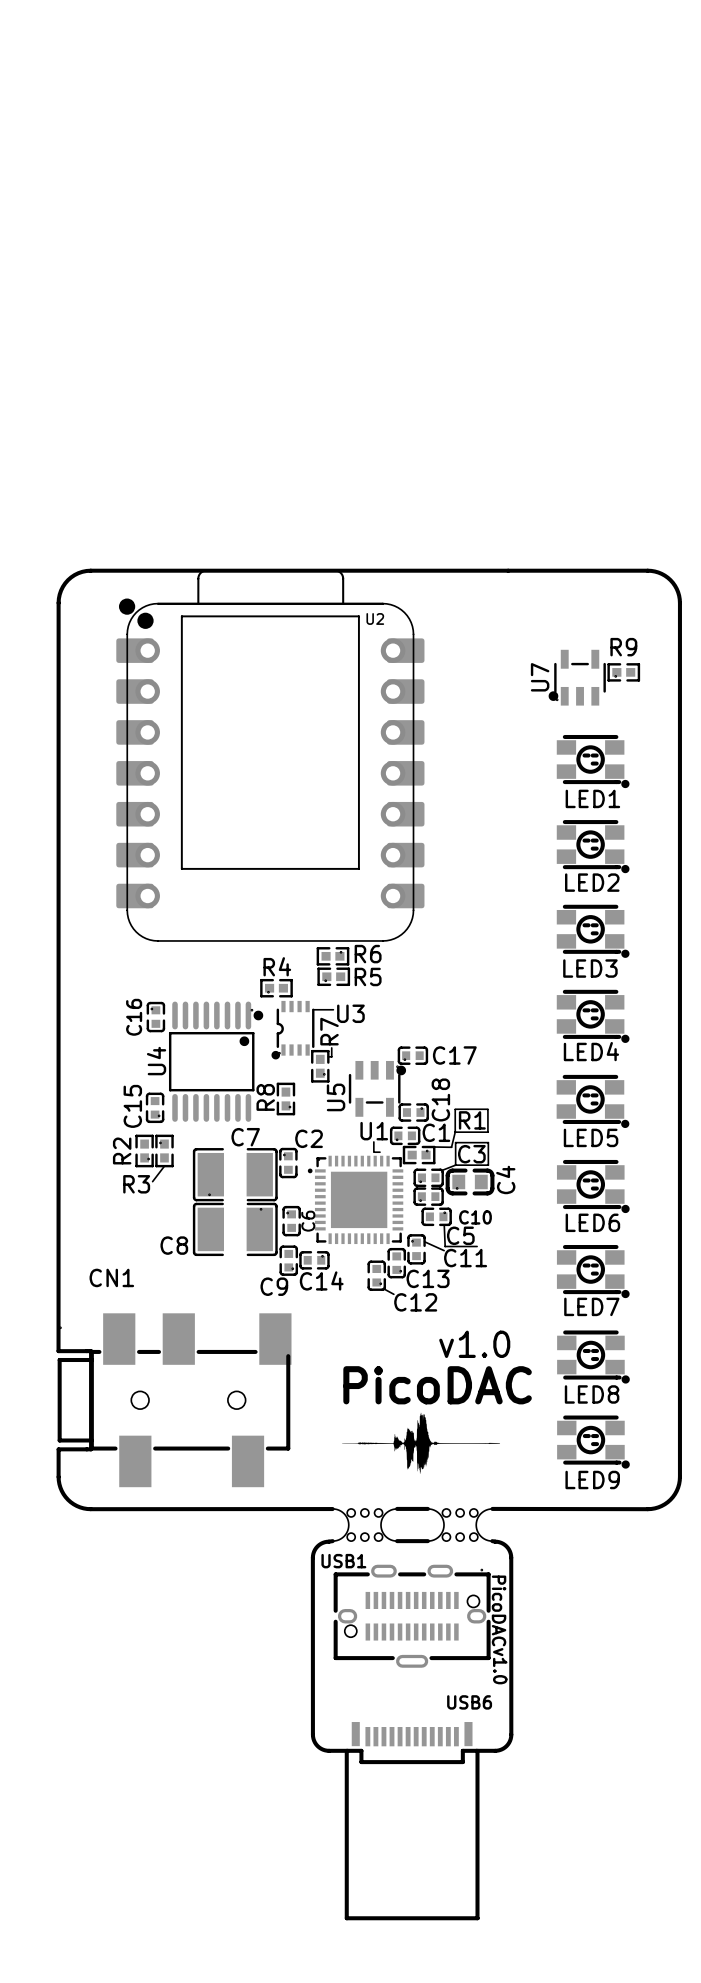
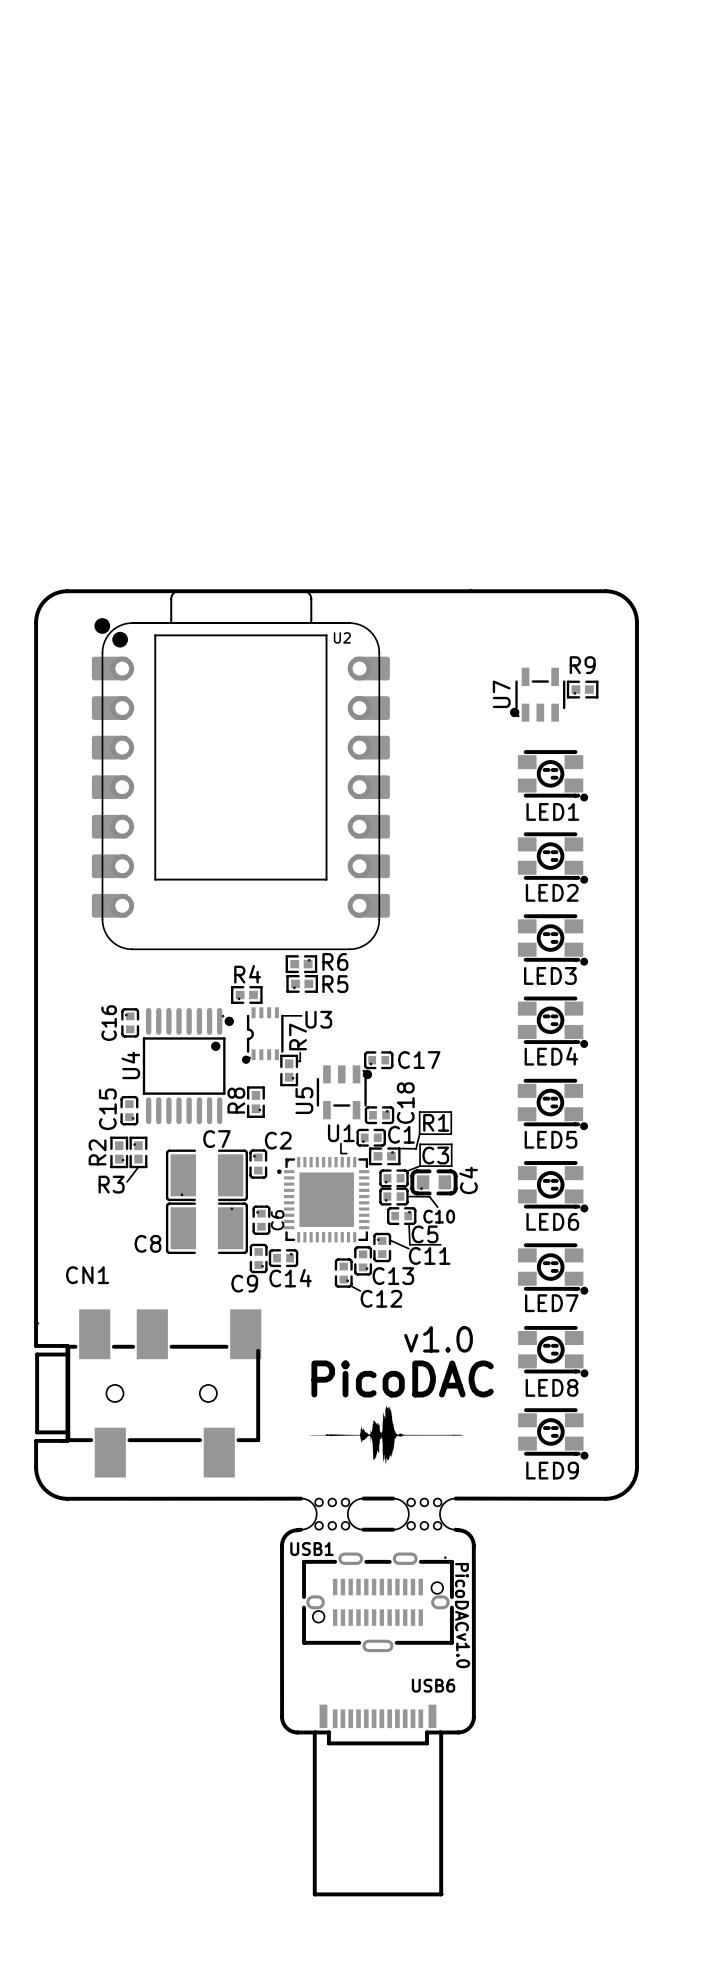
line: none -> (407, 1196) (429, 1196) (437, 1207)

